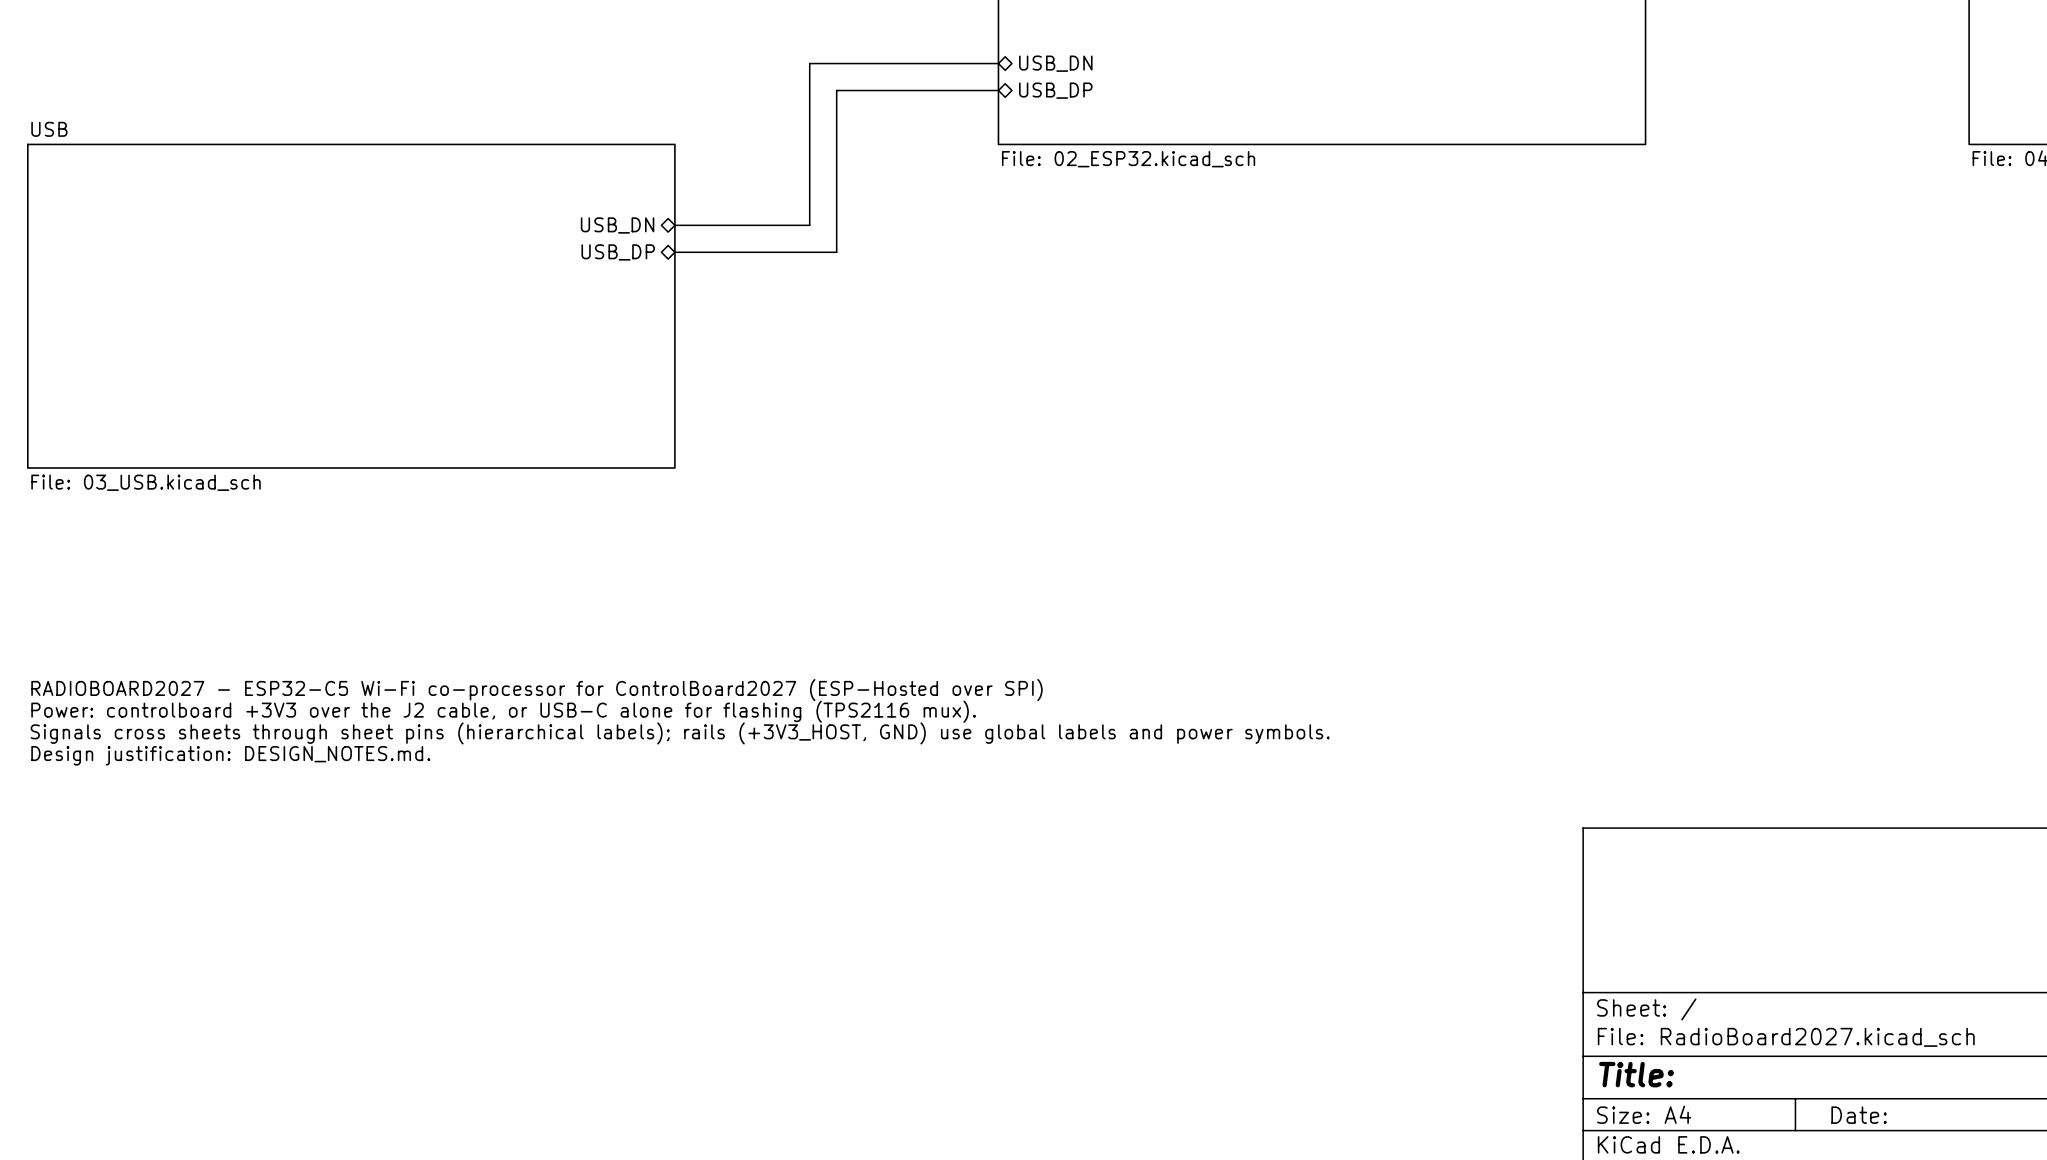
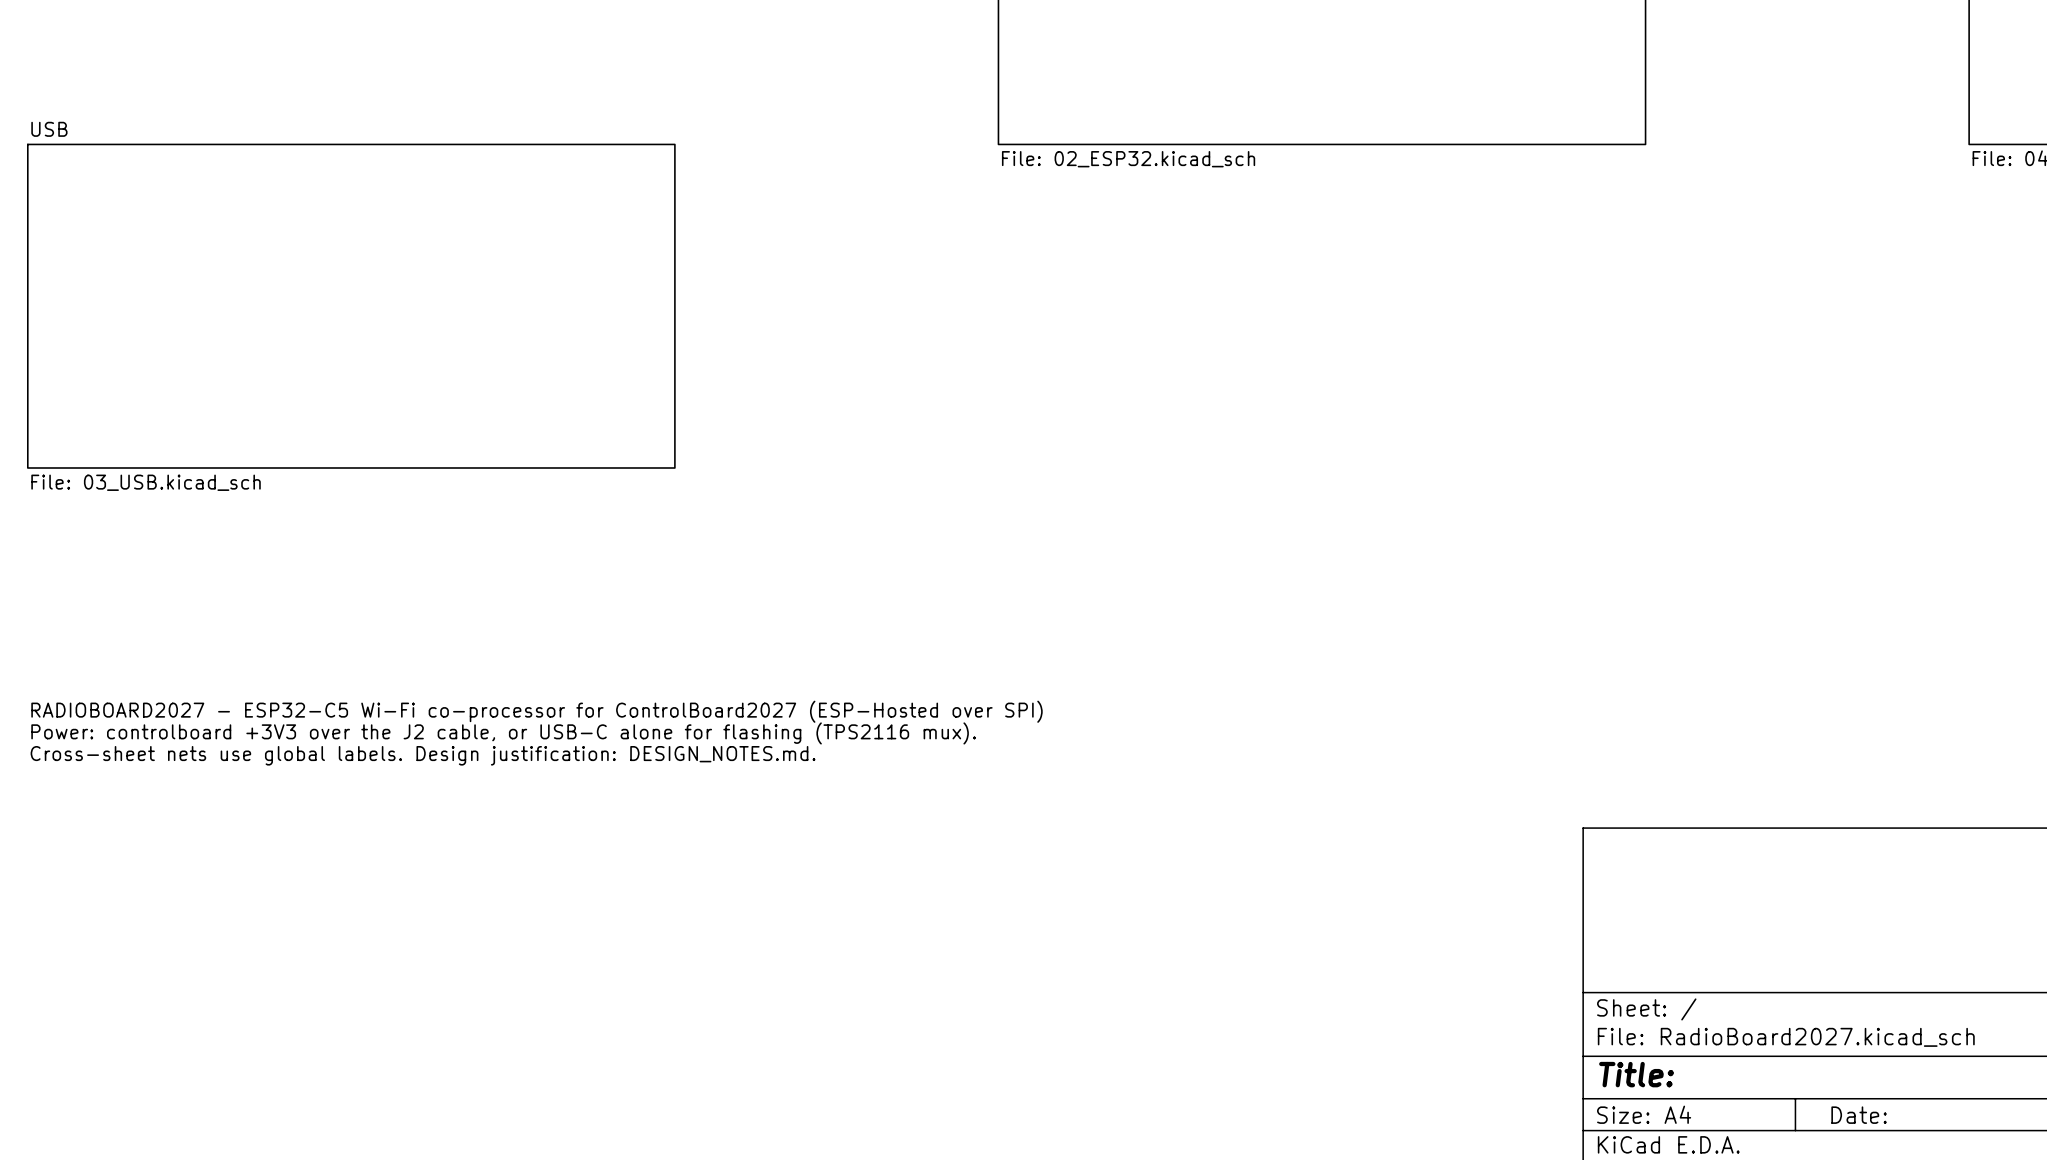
wire: (998, 63) (809, 63) (809, 225) (674, 225) -> none
sheet pin: USB_DN (1055, 63) -> none
wire: (998, 90) (836, 90) (836, 252) (674, 252) -> none
sheet pin: USB_DP (1055, 90) -> none
sheet pin: USB_DN (617, 225) -> none
sheet pin: USB_DP (618, 252) -> none
text: RADIOBOARD2027 - ESP32-C5 Wi-Fi co-processor for ControlBoard2027 (ESP-Hosted over SPI) (536, 690) -> none
text: Power: controlboard +3V3 over the J2 cable, or USB-C alone for flashing (TPS2116 mux). (503, 711) -> RADIOBOARD2027 - ESP32-C5 Wi-Fi co-processor for ControlBoard2027 (ESP-Hosted over SPI) (536, 711)
text: Signals cross sheets through sheet pins (hierarchical labels); rails (+3V3_HOST, GND) use global labels and power symbols. (680, 733) -> Power: controlboard +3V3 over the J2 cable, or USB-C alone for flashing (TPS2116 mux). (503, 733)
text: Design justification: DESIGN_NOTES.md. (230, 755) -> Cross-sheet nets use global labels. Design justification: DESIGN_NOTES.md. (423, 755)

